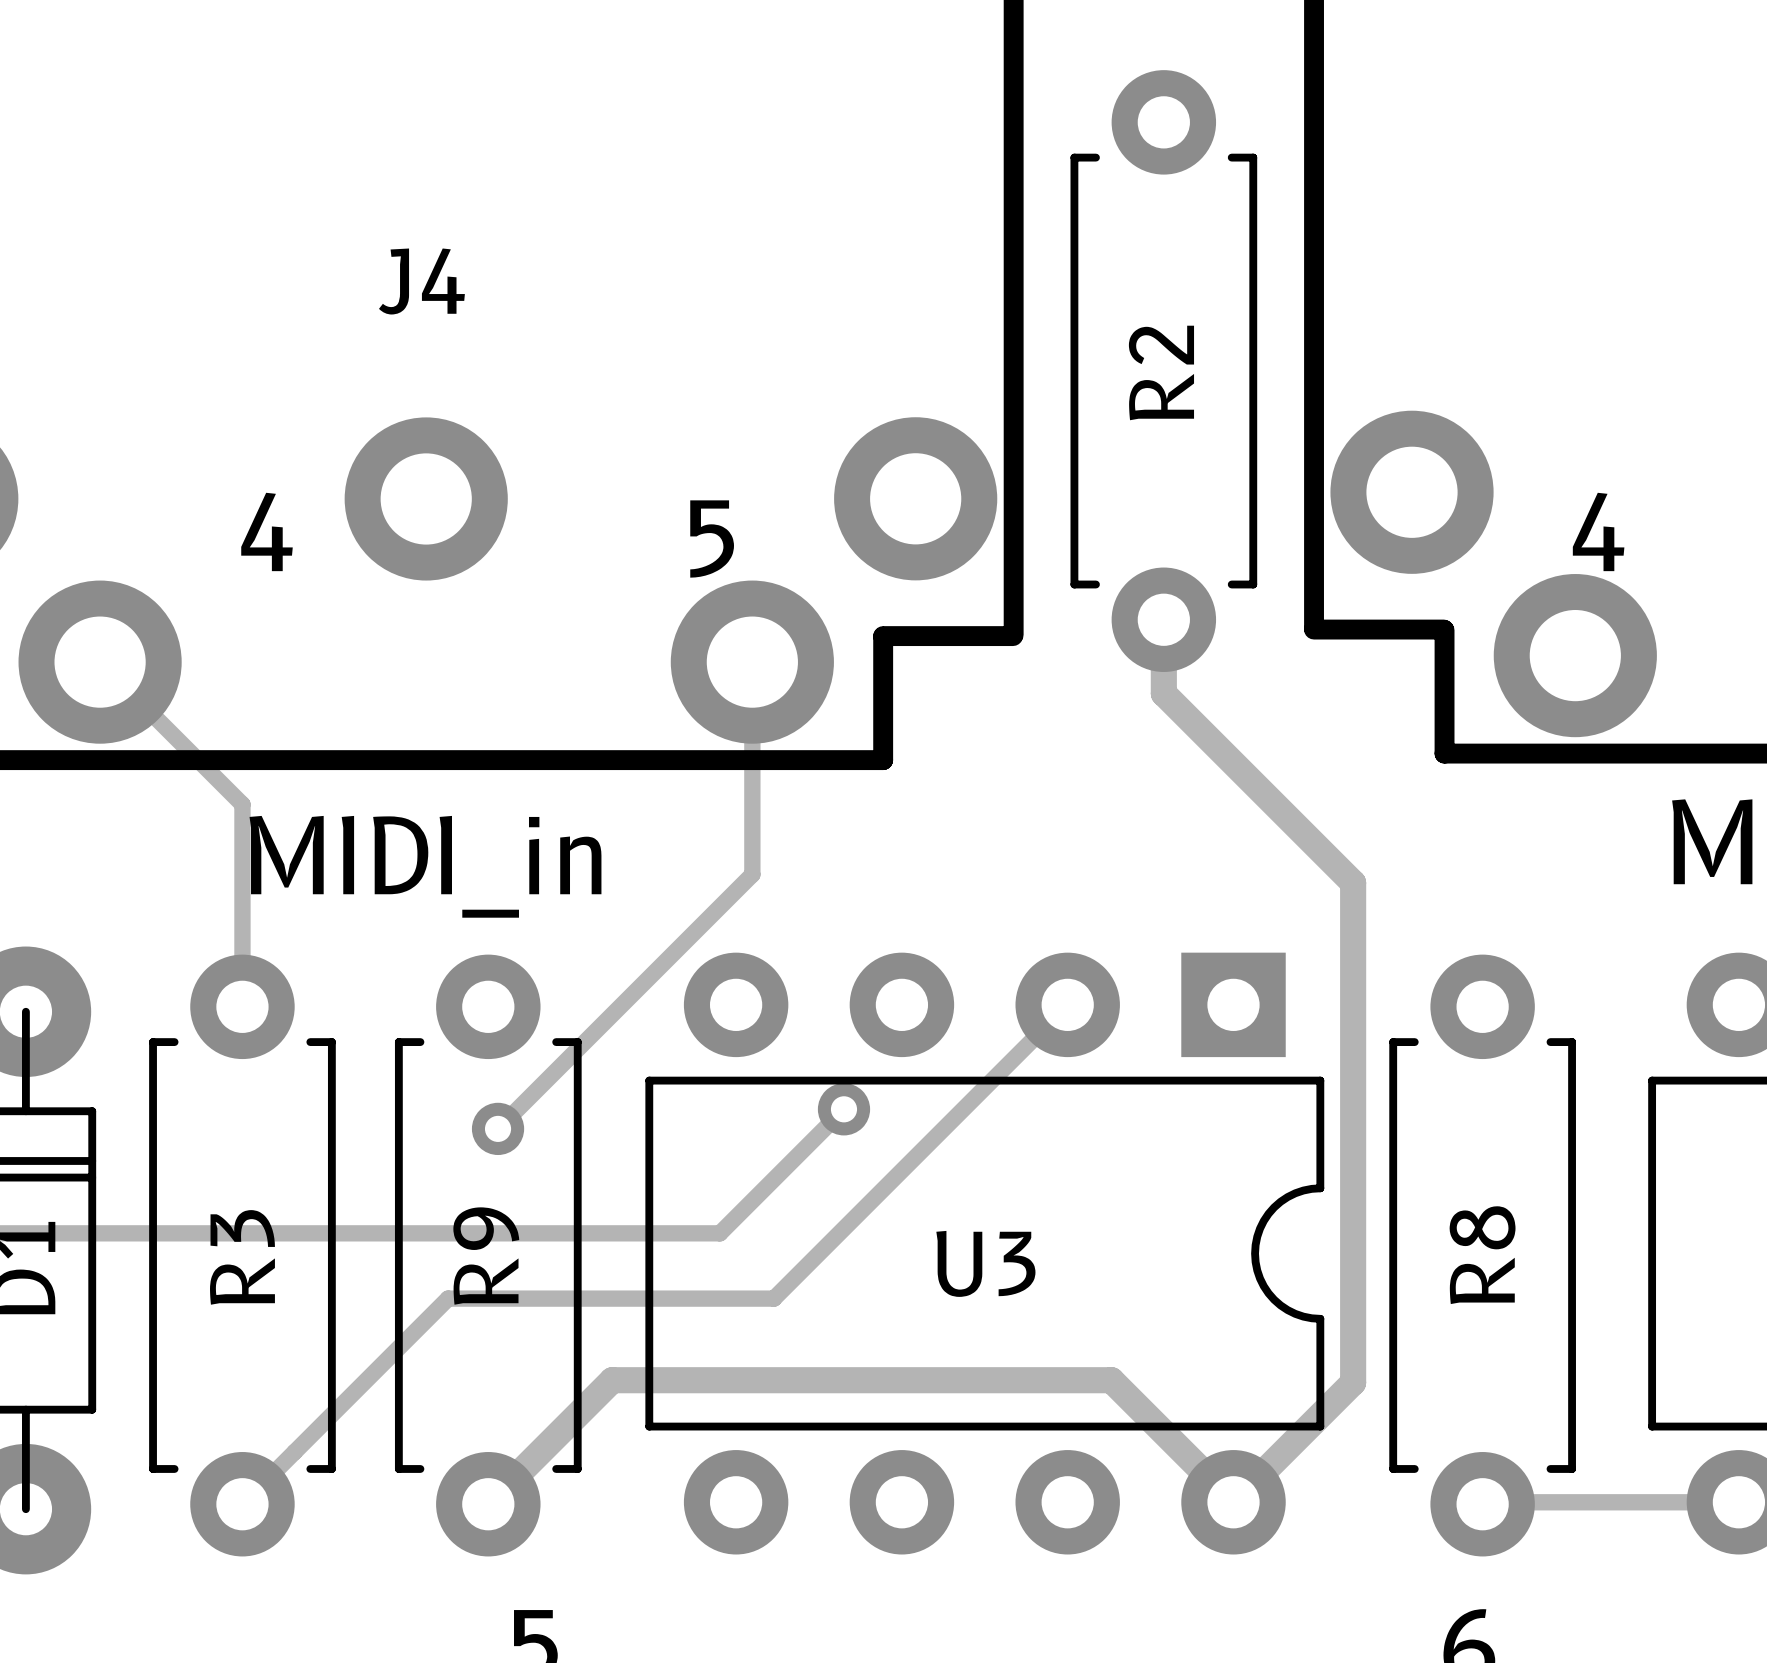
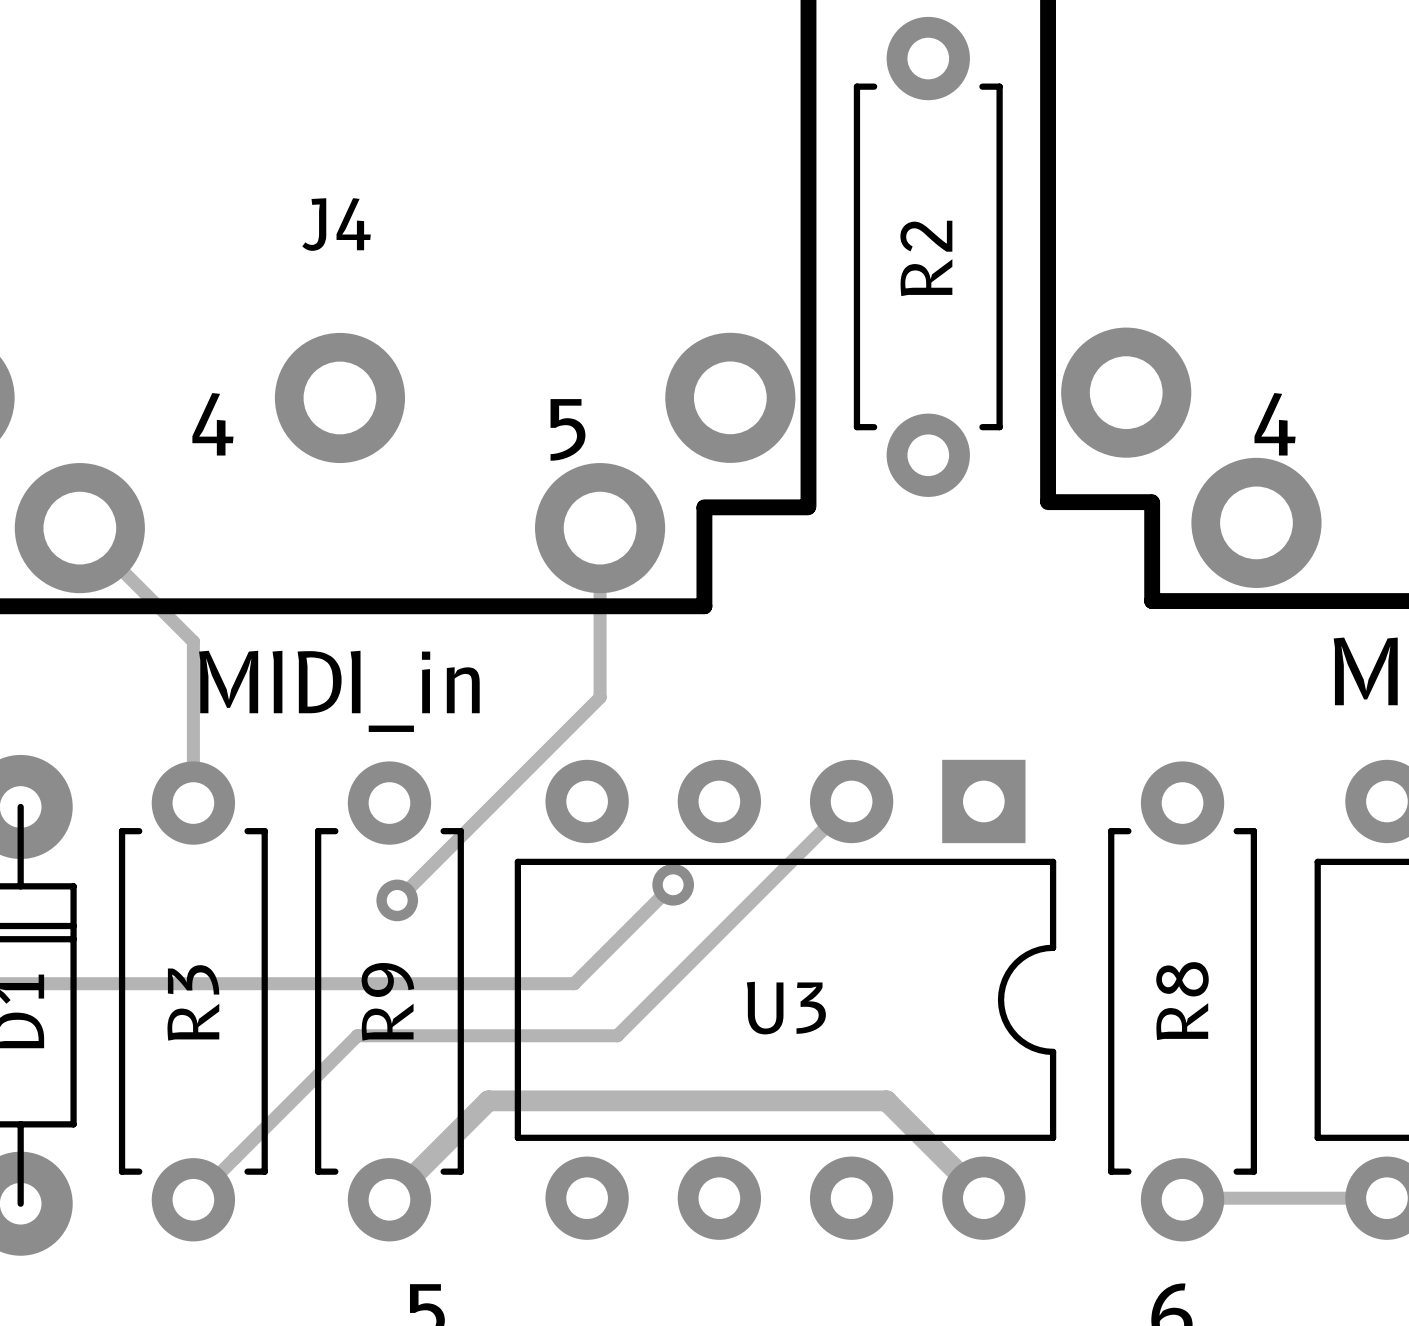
R2 position: (1163, 371) -> (928, 256)
track: (1163, 619) (1163, 693) (1353, 882) (1353, 1382) (1233, 1502) -> none

